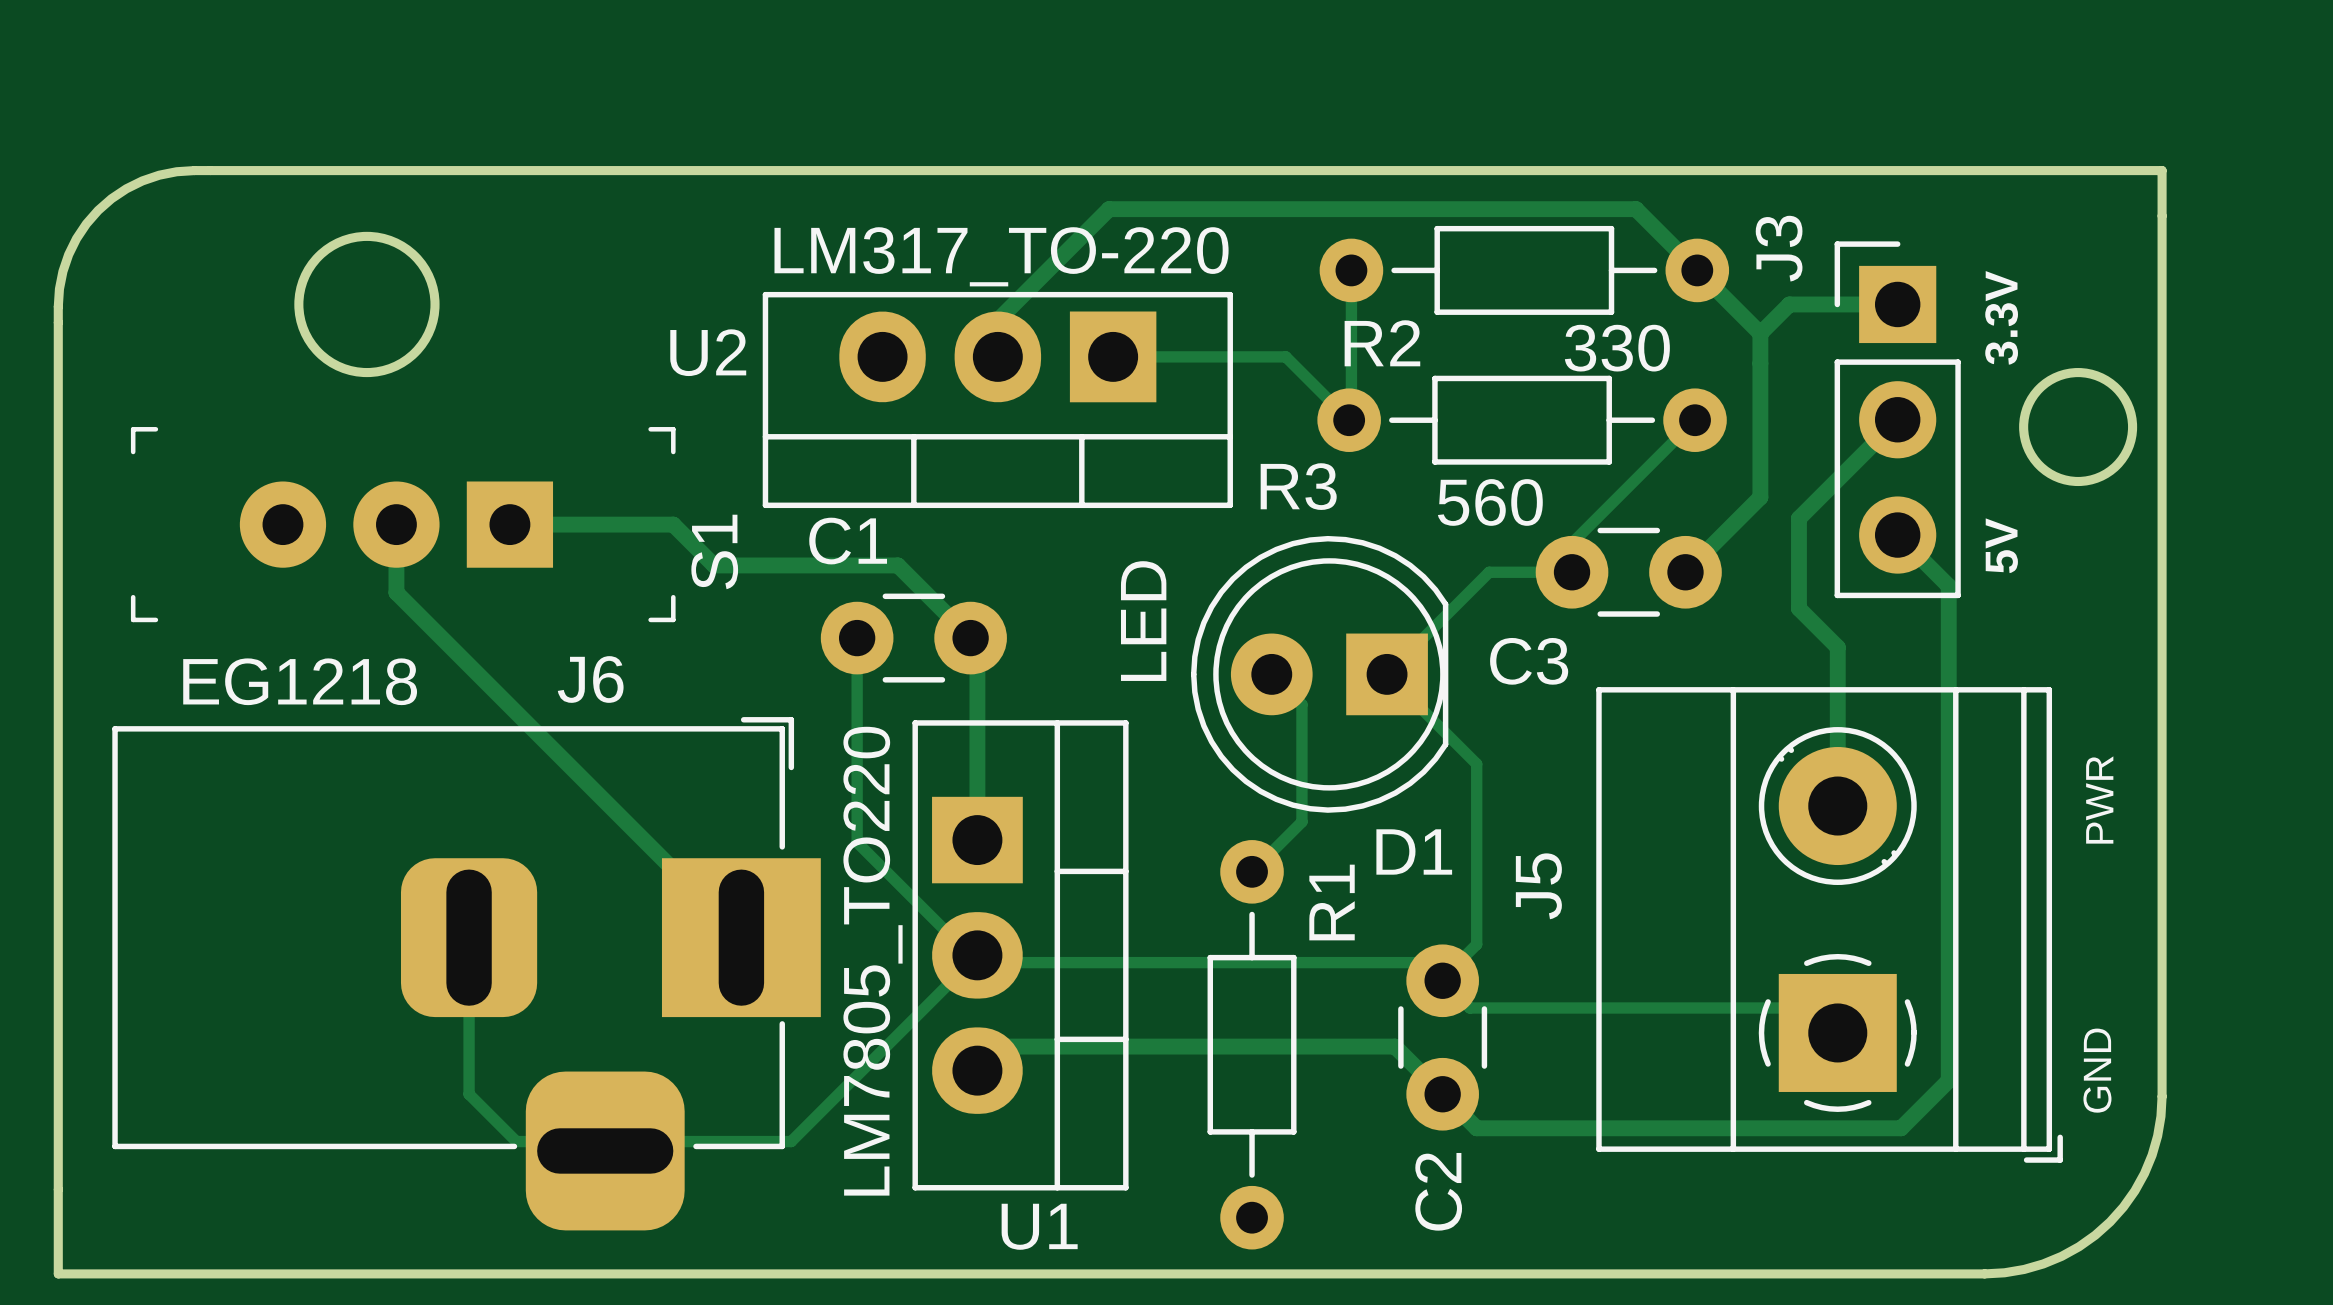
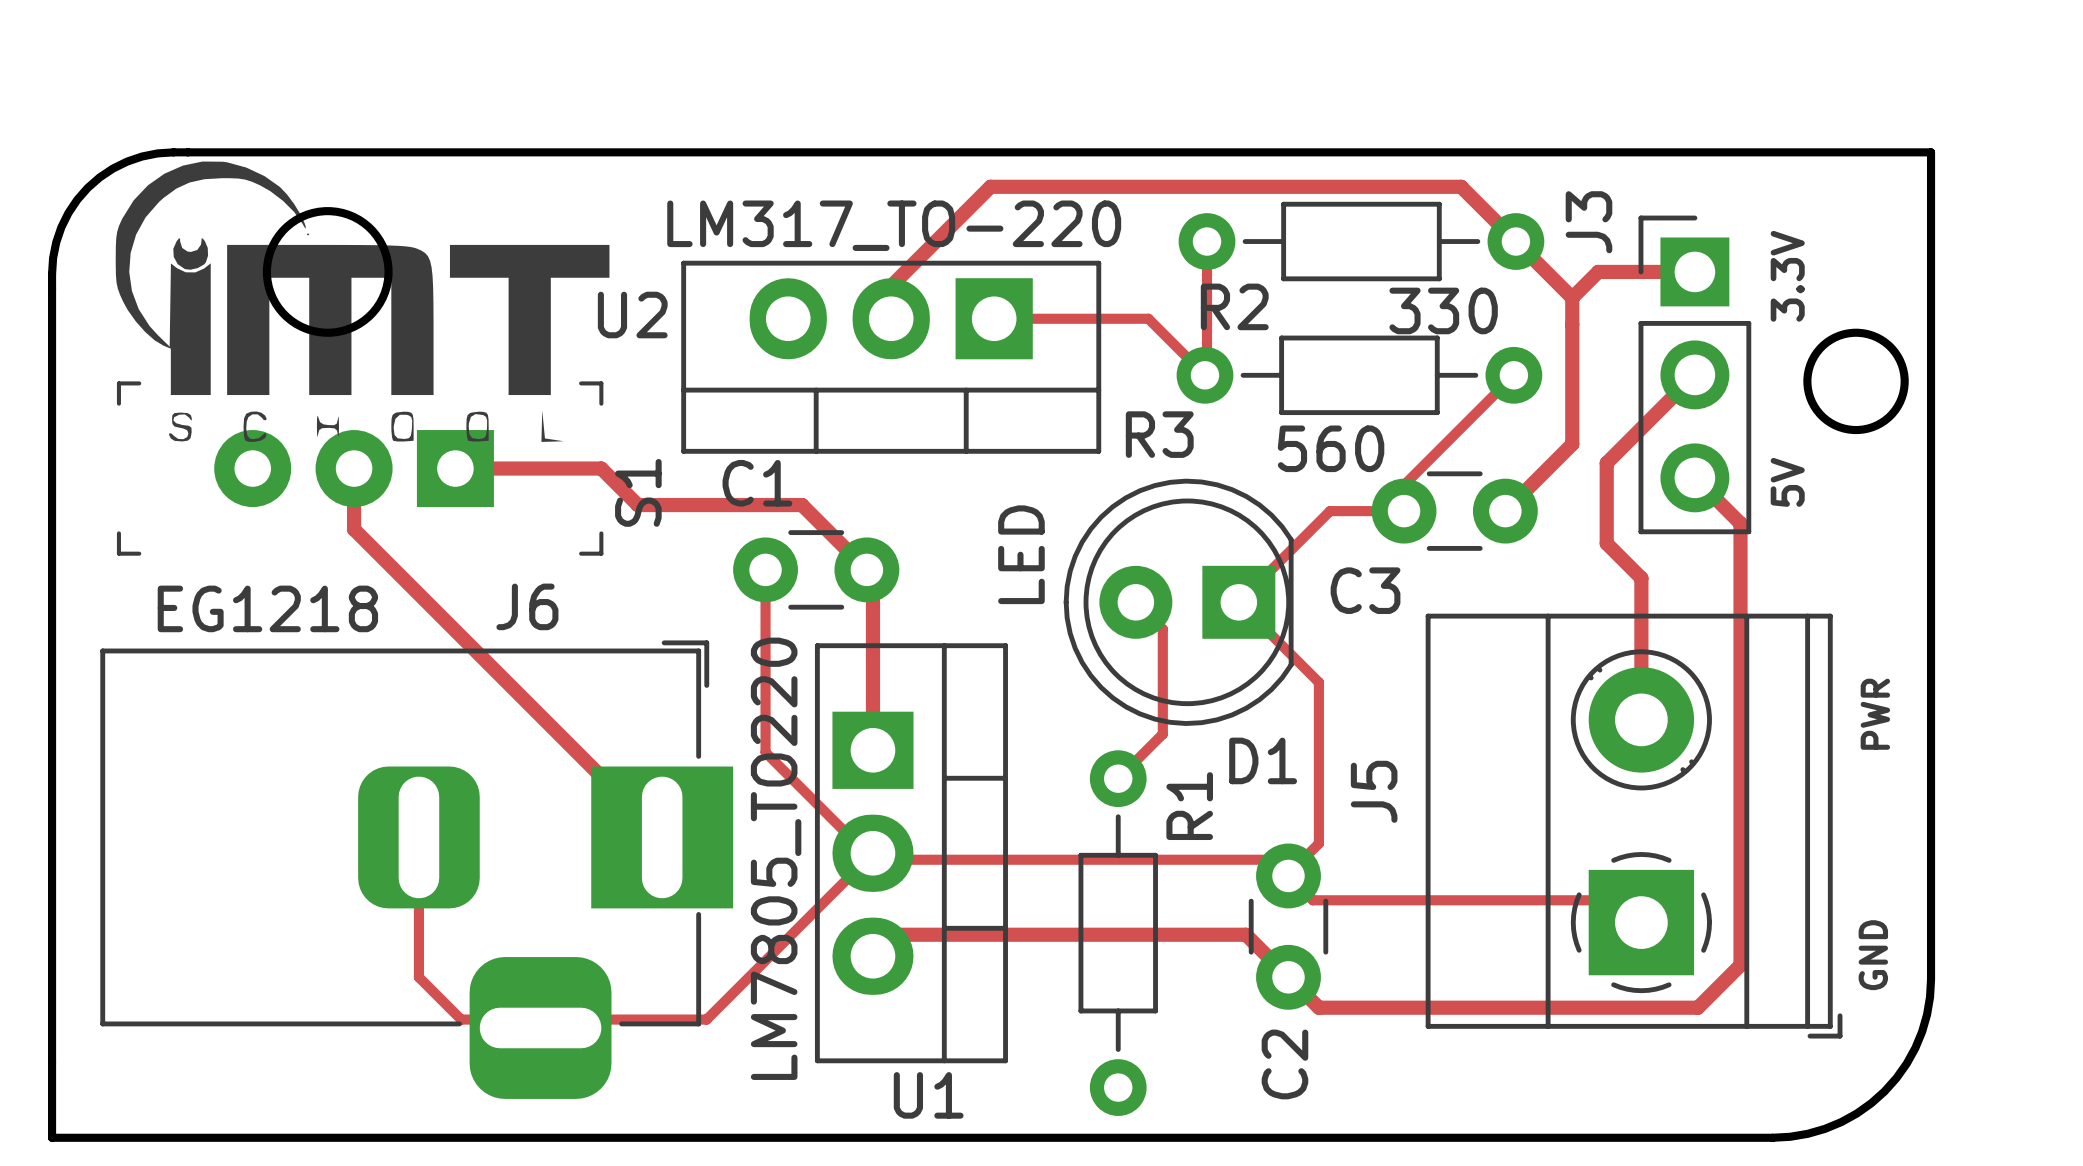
drawing: none -> [115, 161, 610, 442]

